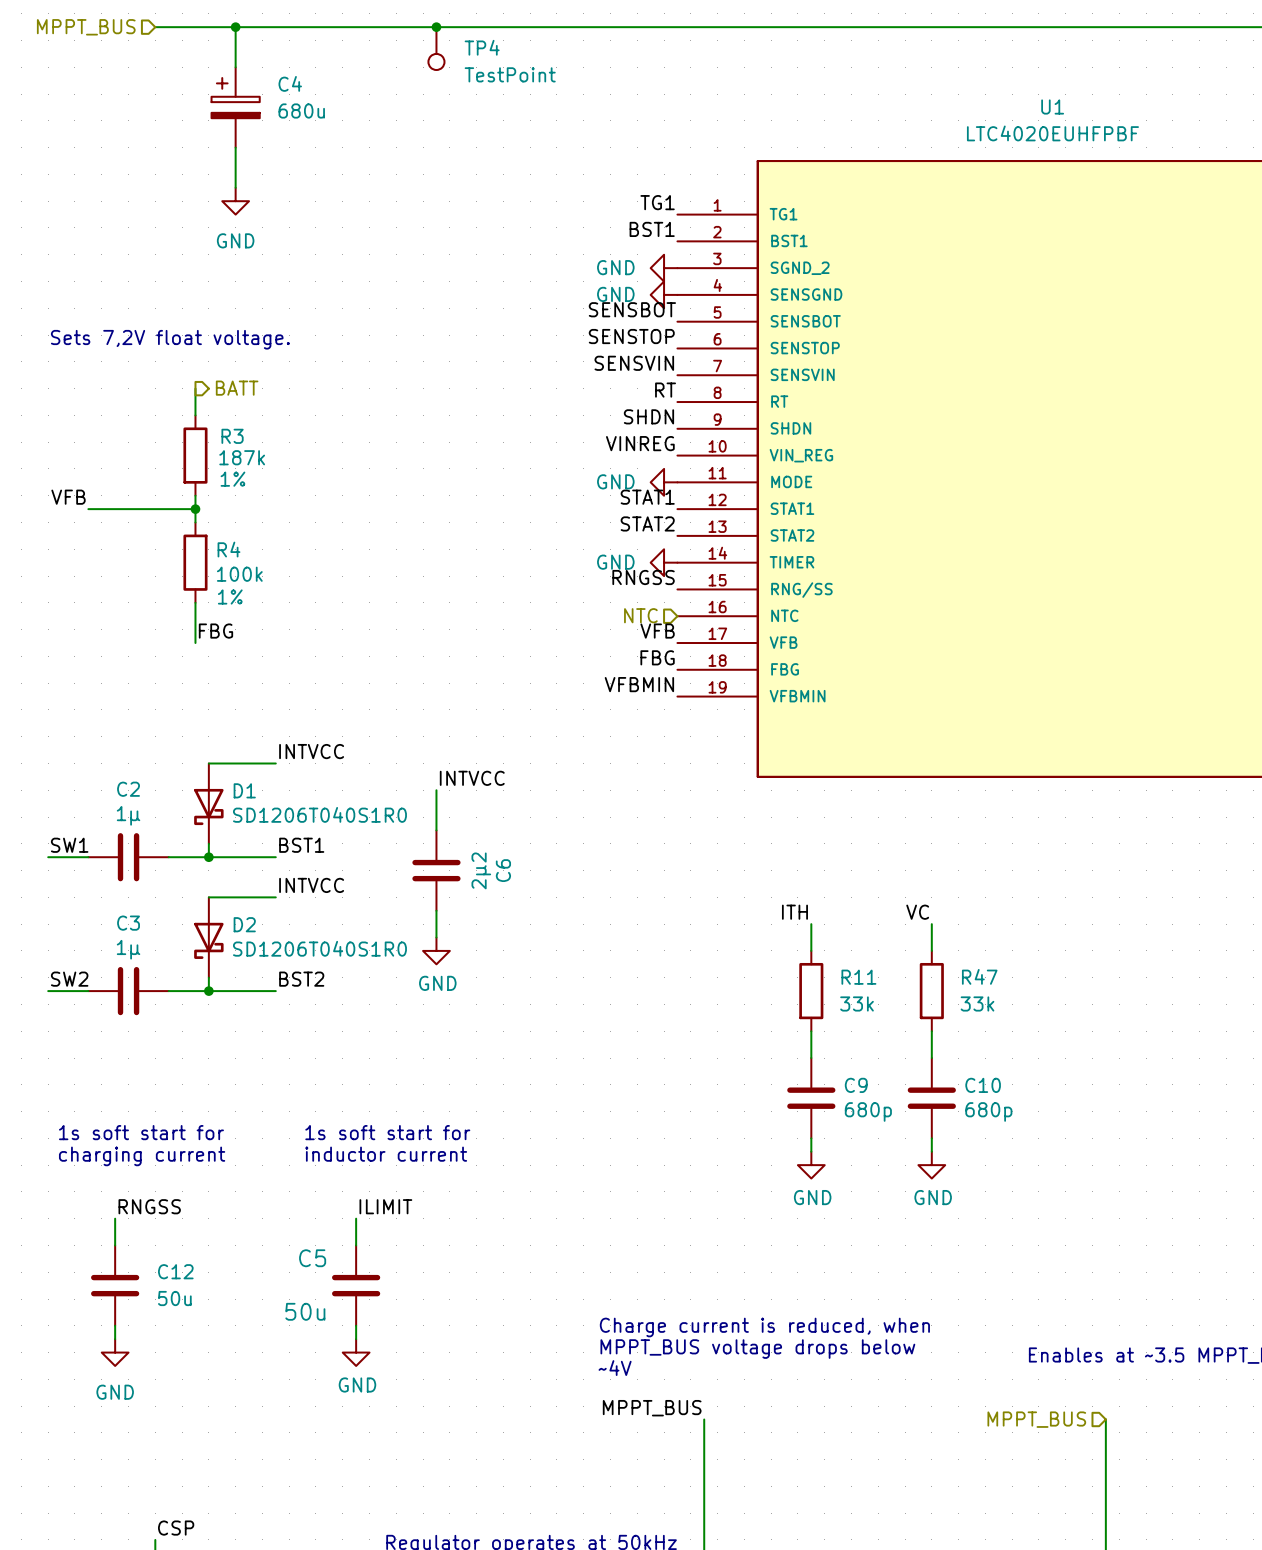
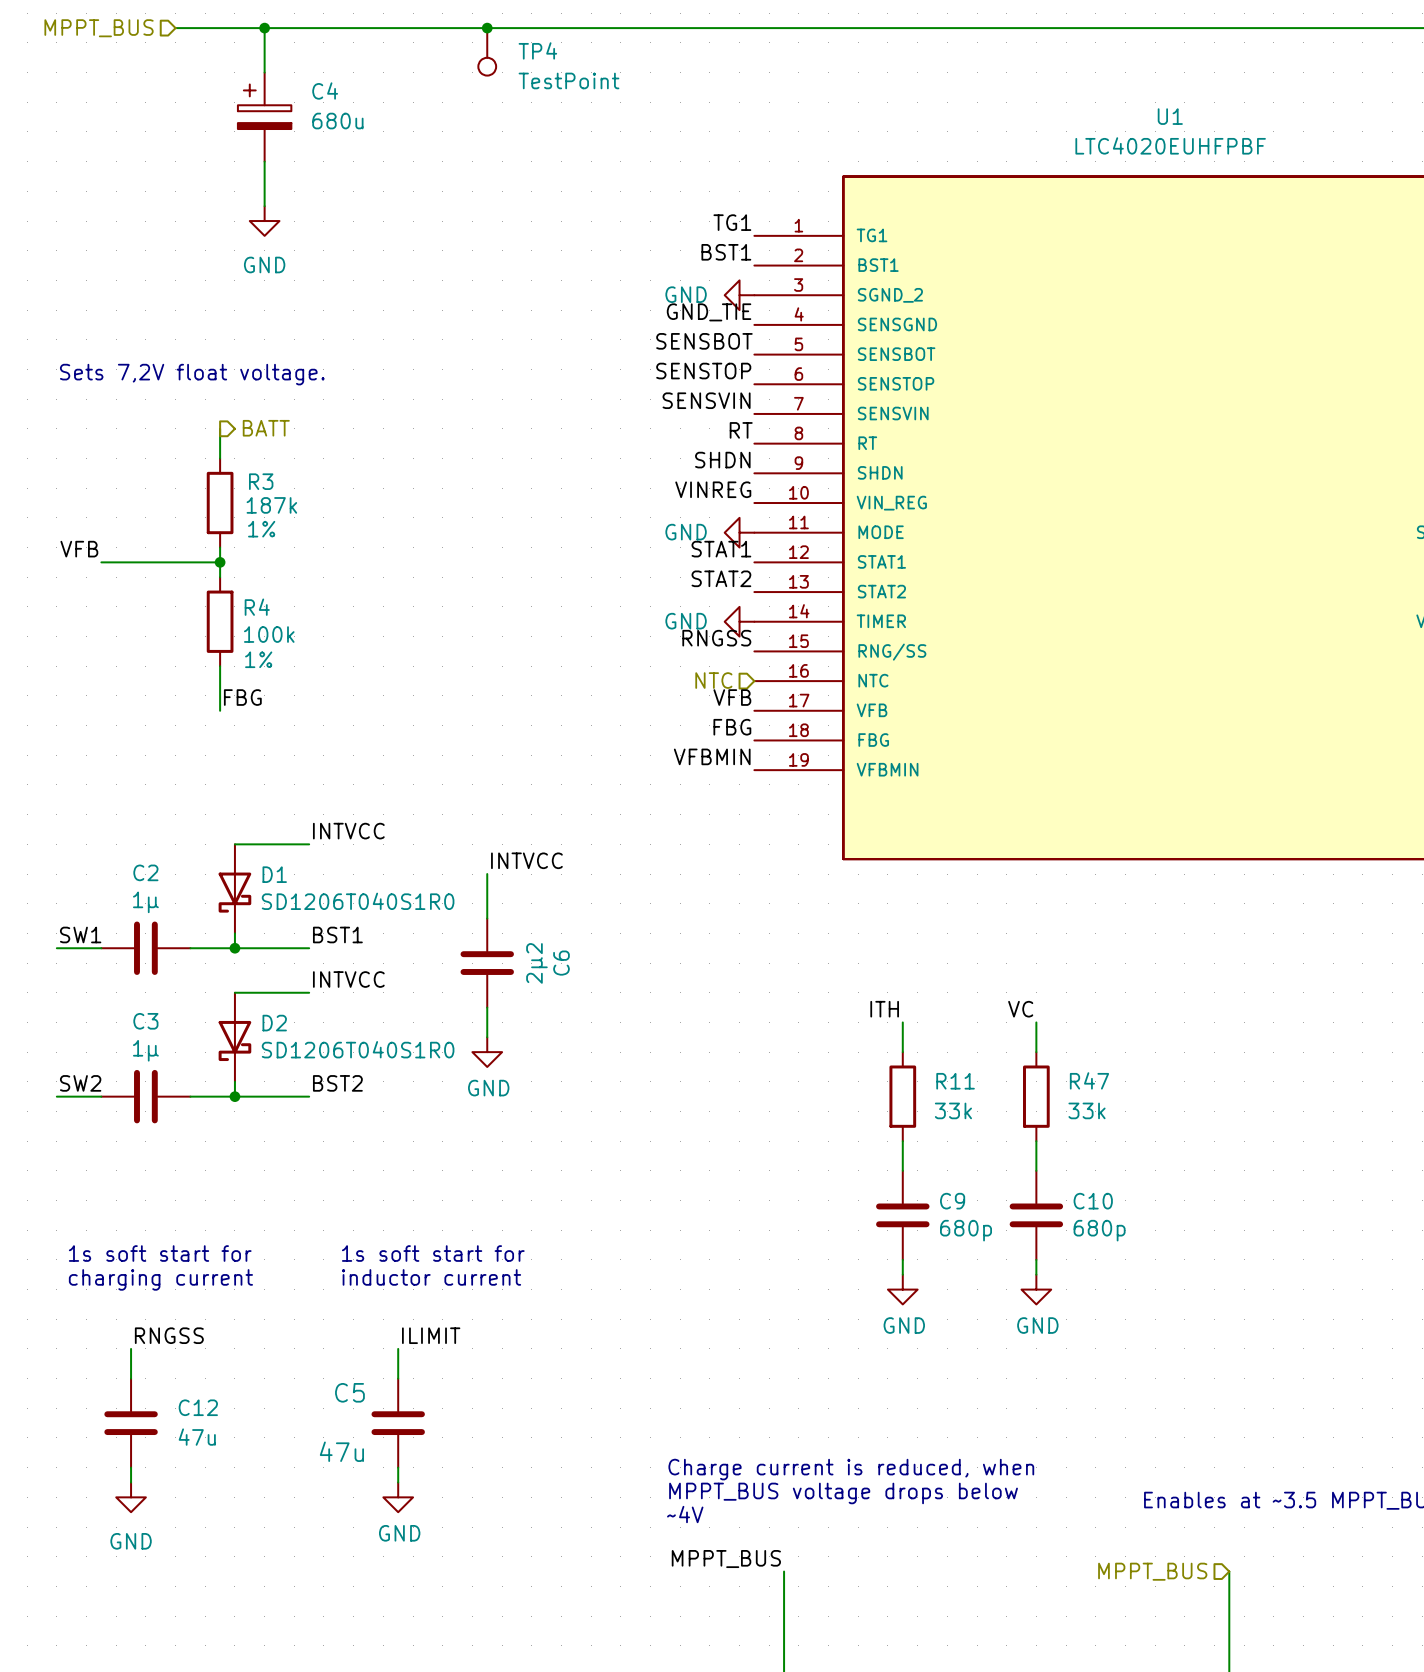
label: none -> GND_TIE (709, 312)
power symbol: GND (664, 294) -> none
C12 value: 50u (174, 1298) -> 47u (197, 1437)
C5 value: 50u (305, 1311) -> 47u (341, 1451)

